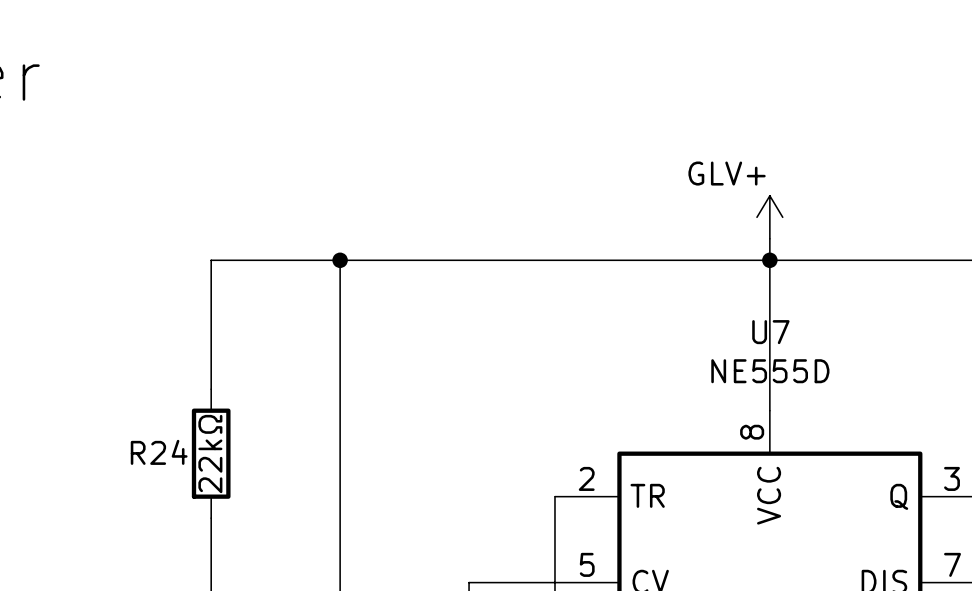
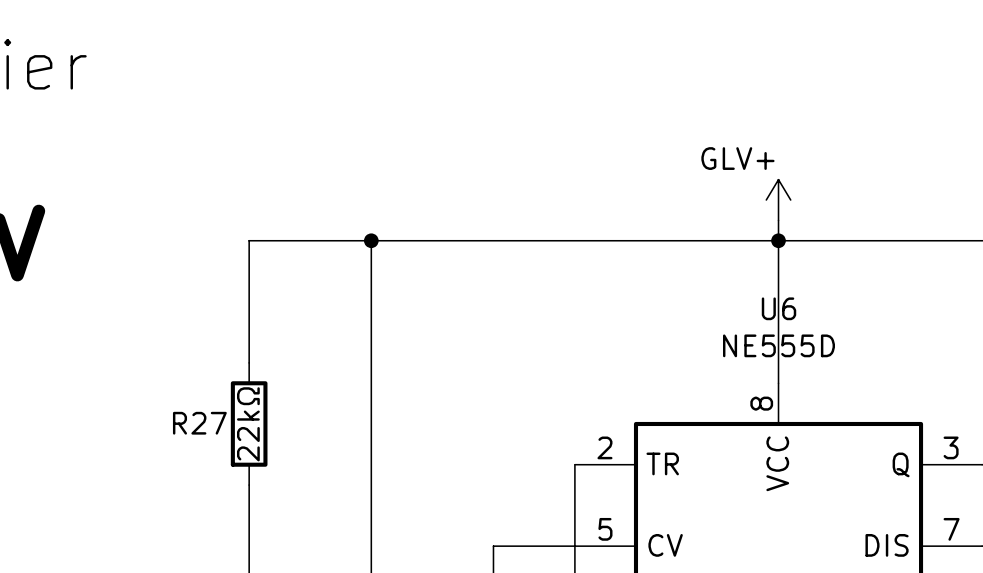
U7 name: U7 (770, 332) -> U6 (779, 308)
R24 name: R24 (159, 452) -> R27 (199, 423)

